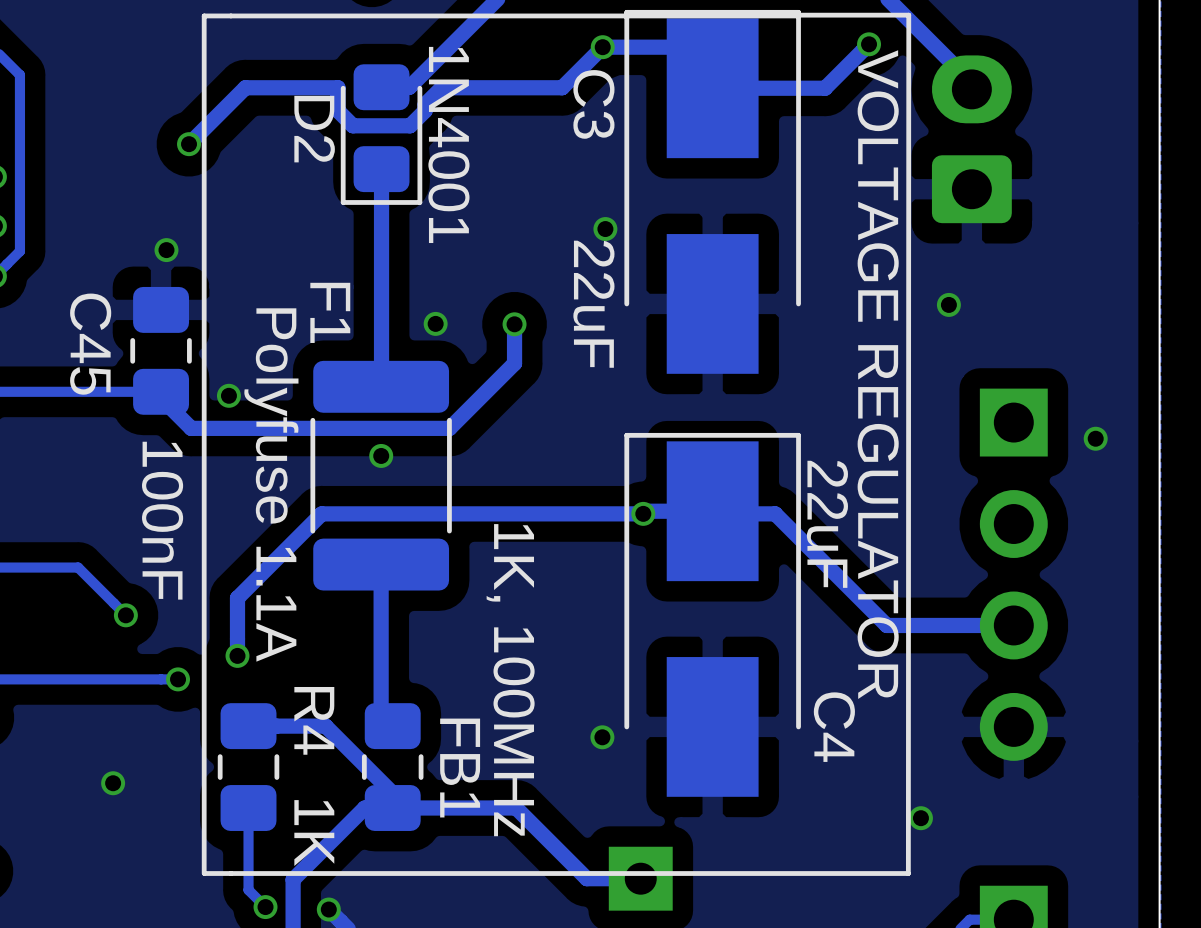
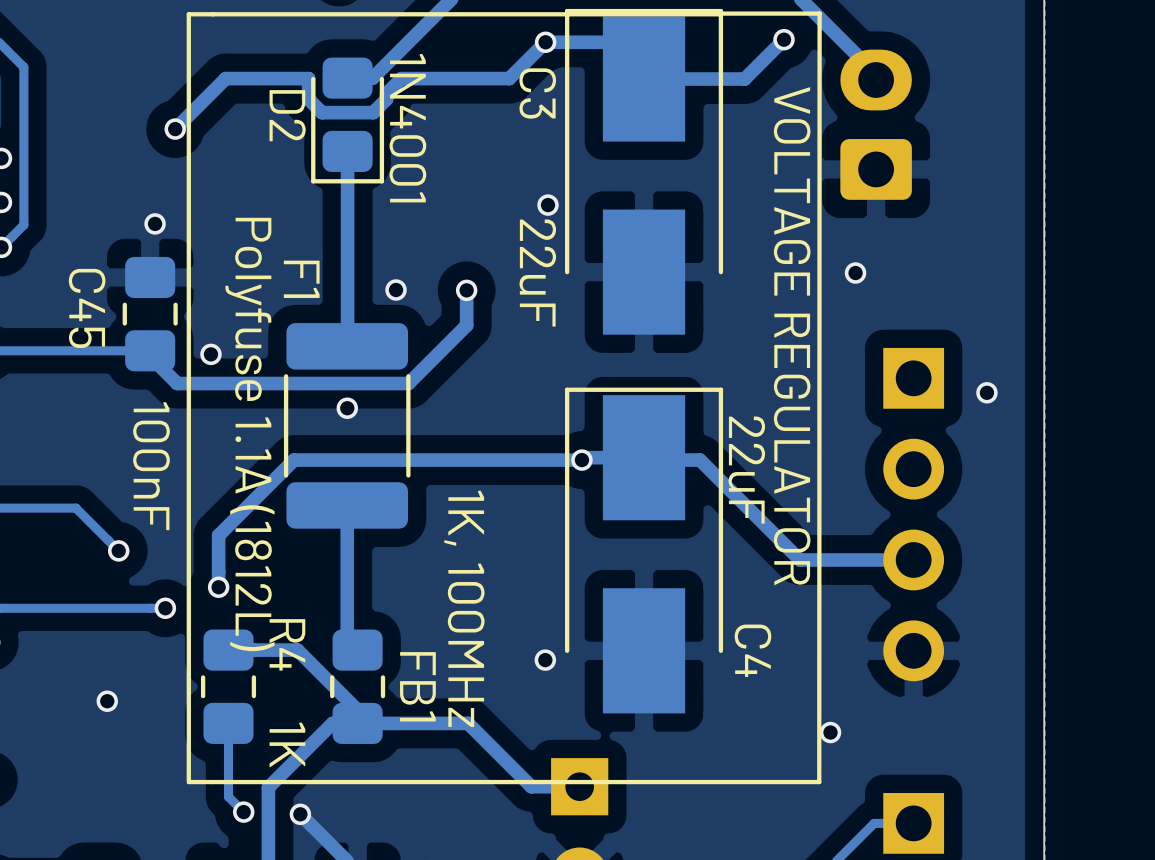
F1 value: Polyfuse 1.1A (271, 485) -> Polyfuse 1.1A (1812L) (249, 434)

